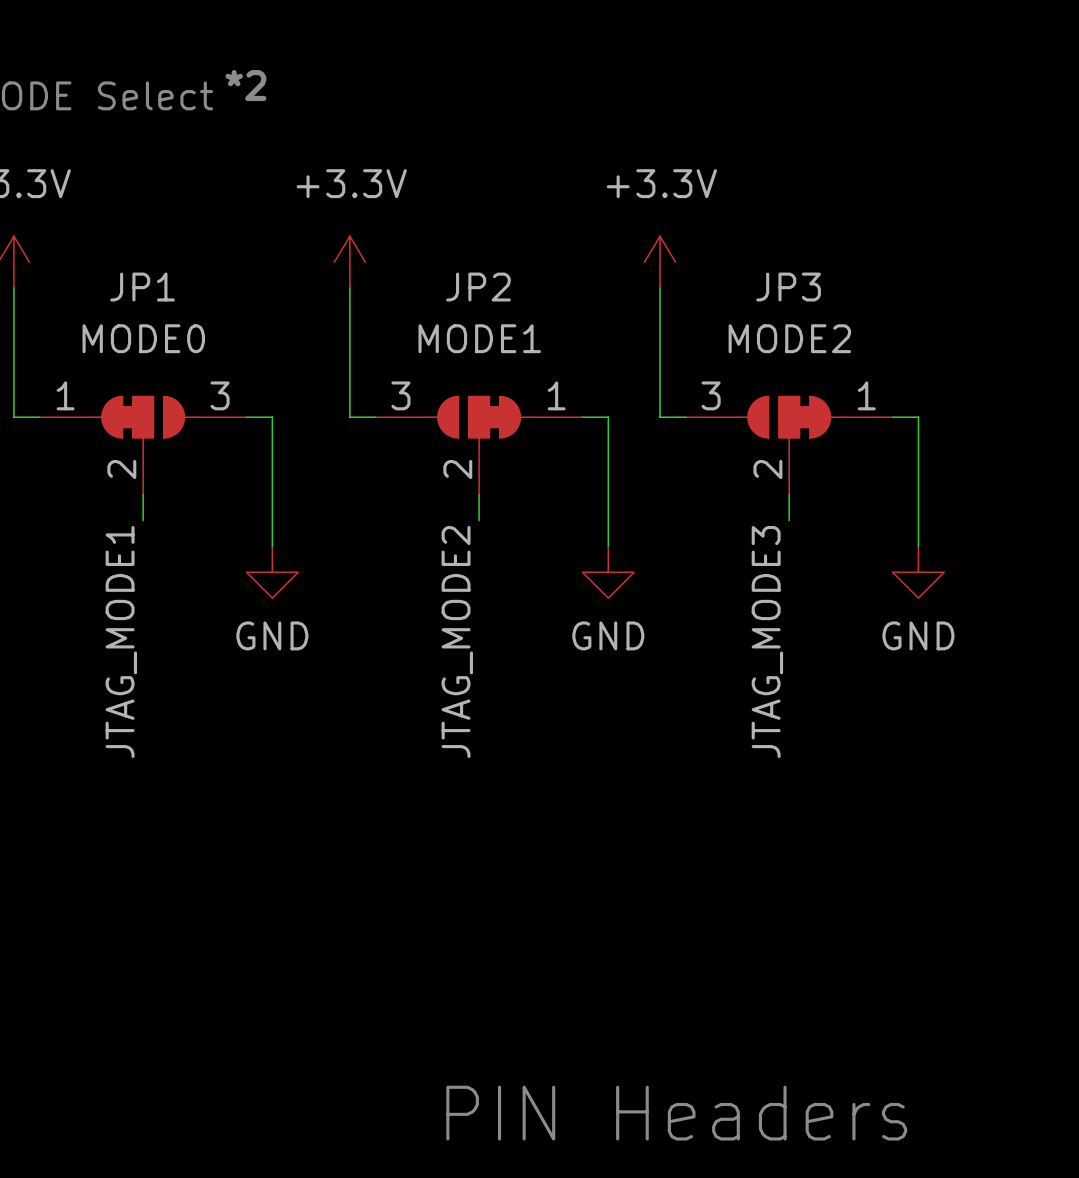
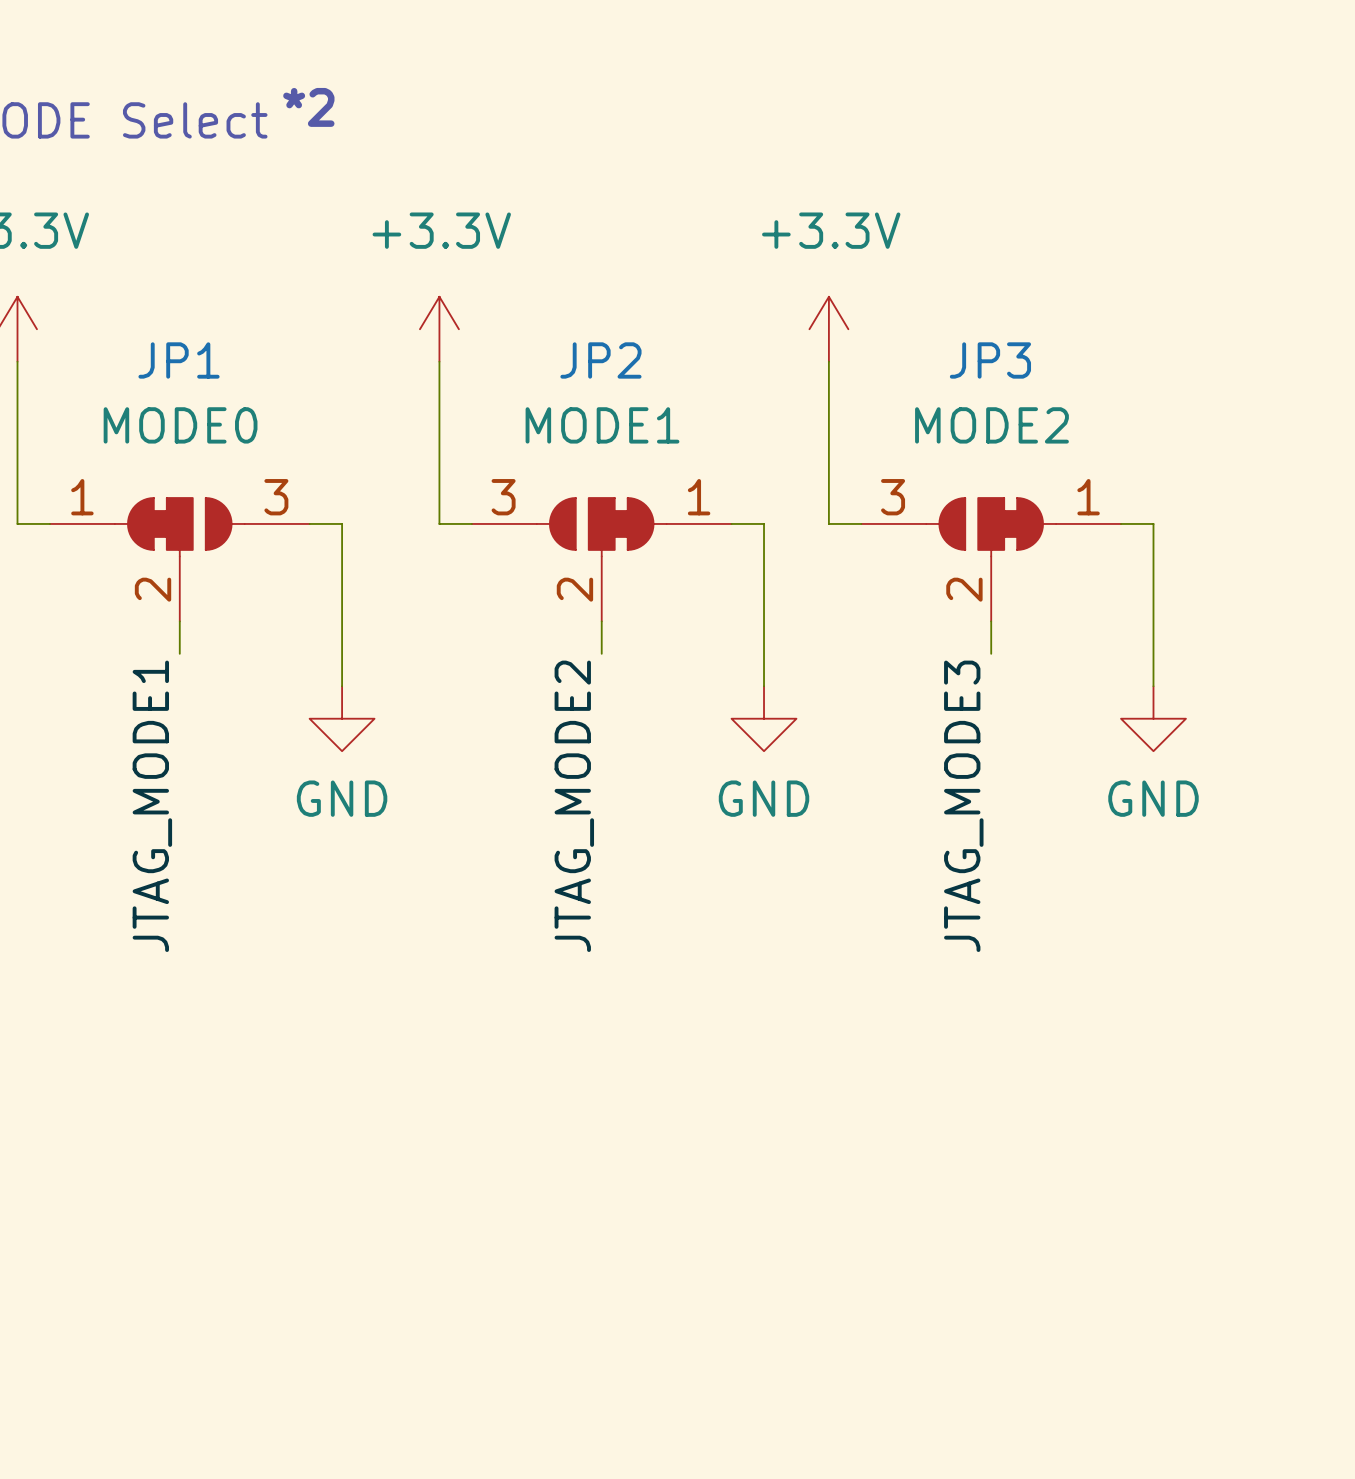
text: PIN Headers (676, 1113) -> none

